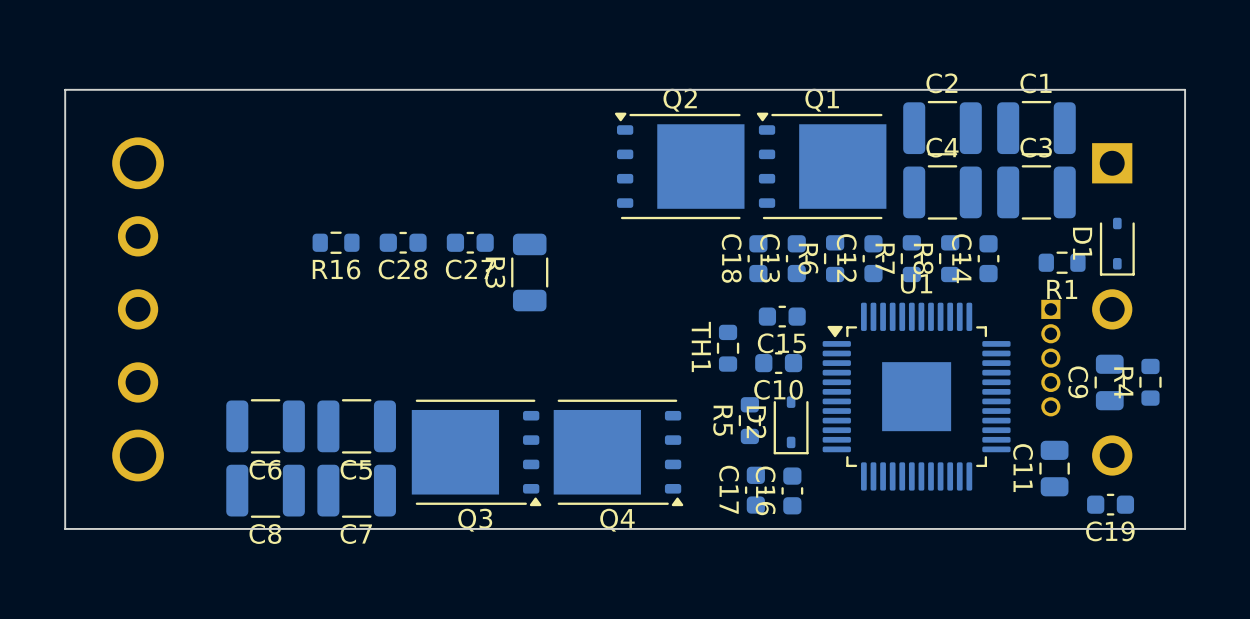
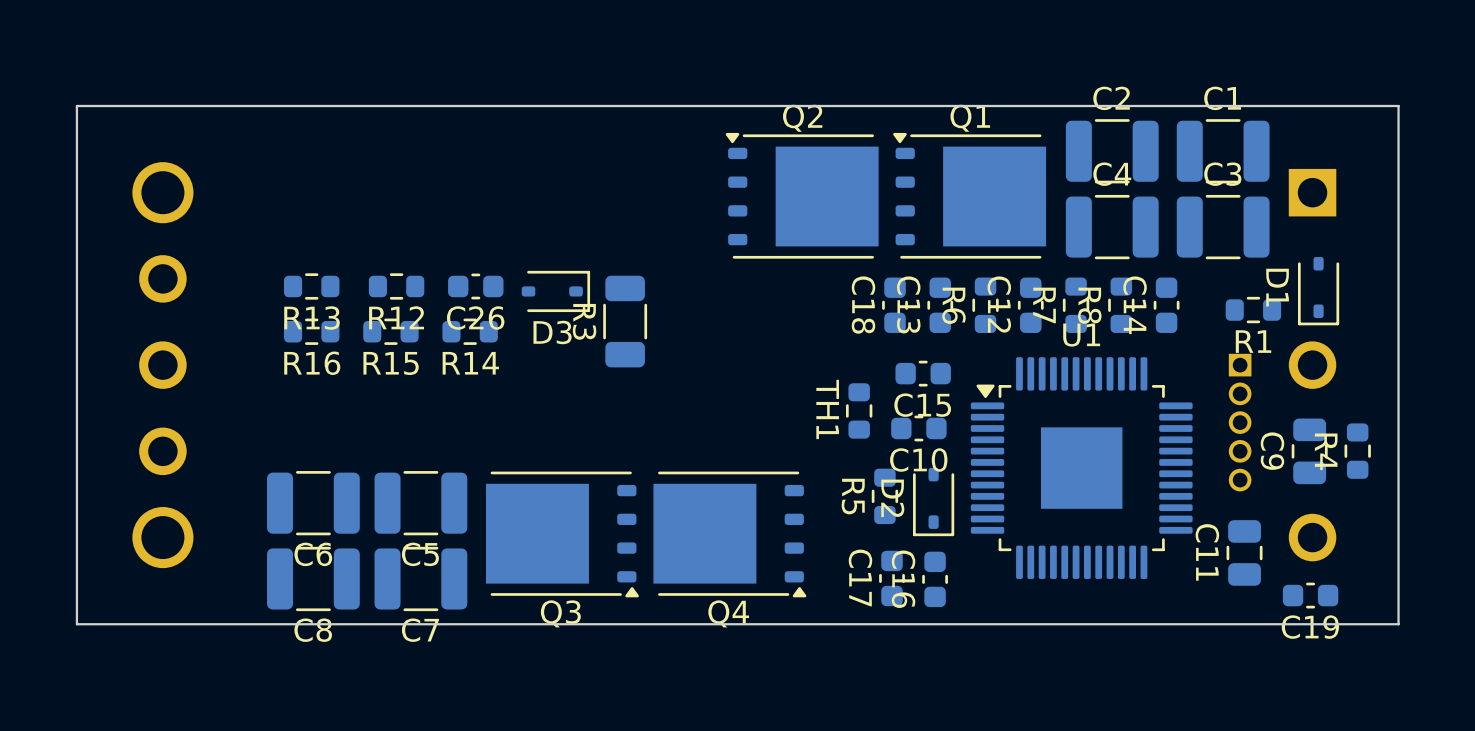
R13: none -> (311, 286)
C27: (470, 242) -> none
D3: none -> (555, 291)
R16 name: R16 (336, 269) -> R12 (396, 317)
C28 name: C28 (403, 269) -> C26 (475, 318)
R16: none -> (311, 331)
R15: none -> (390, 331)
R14: none -> (470, 331)

